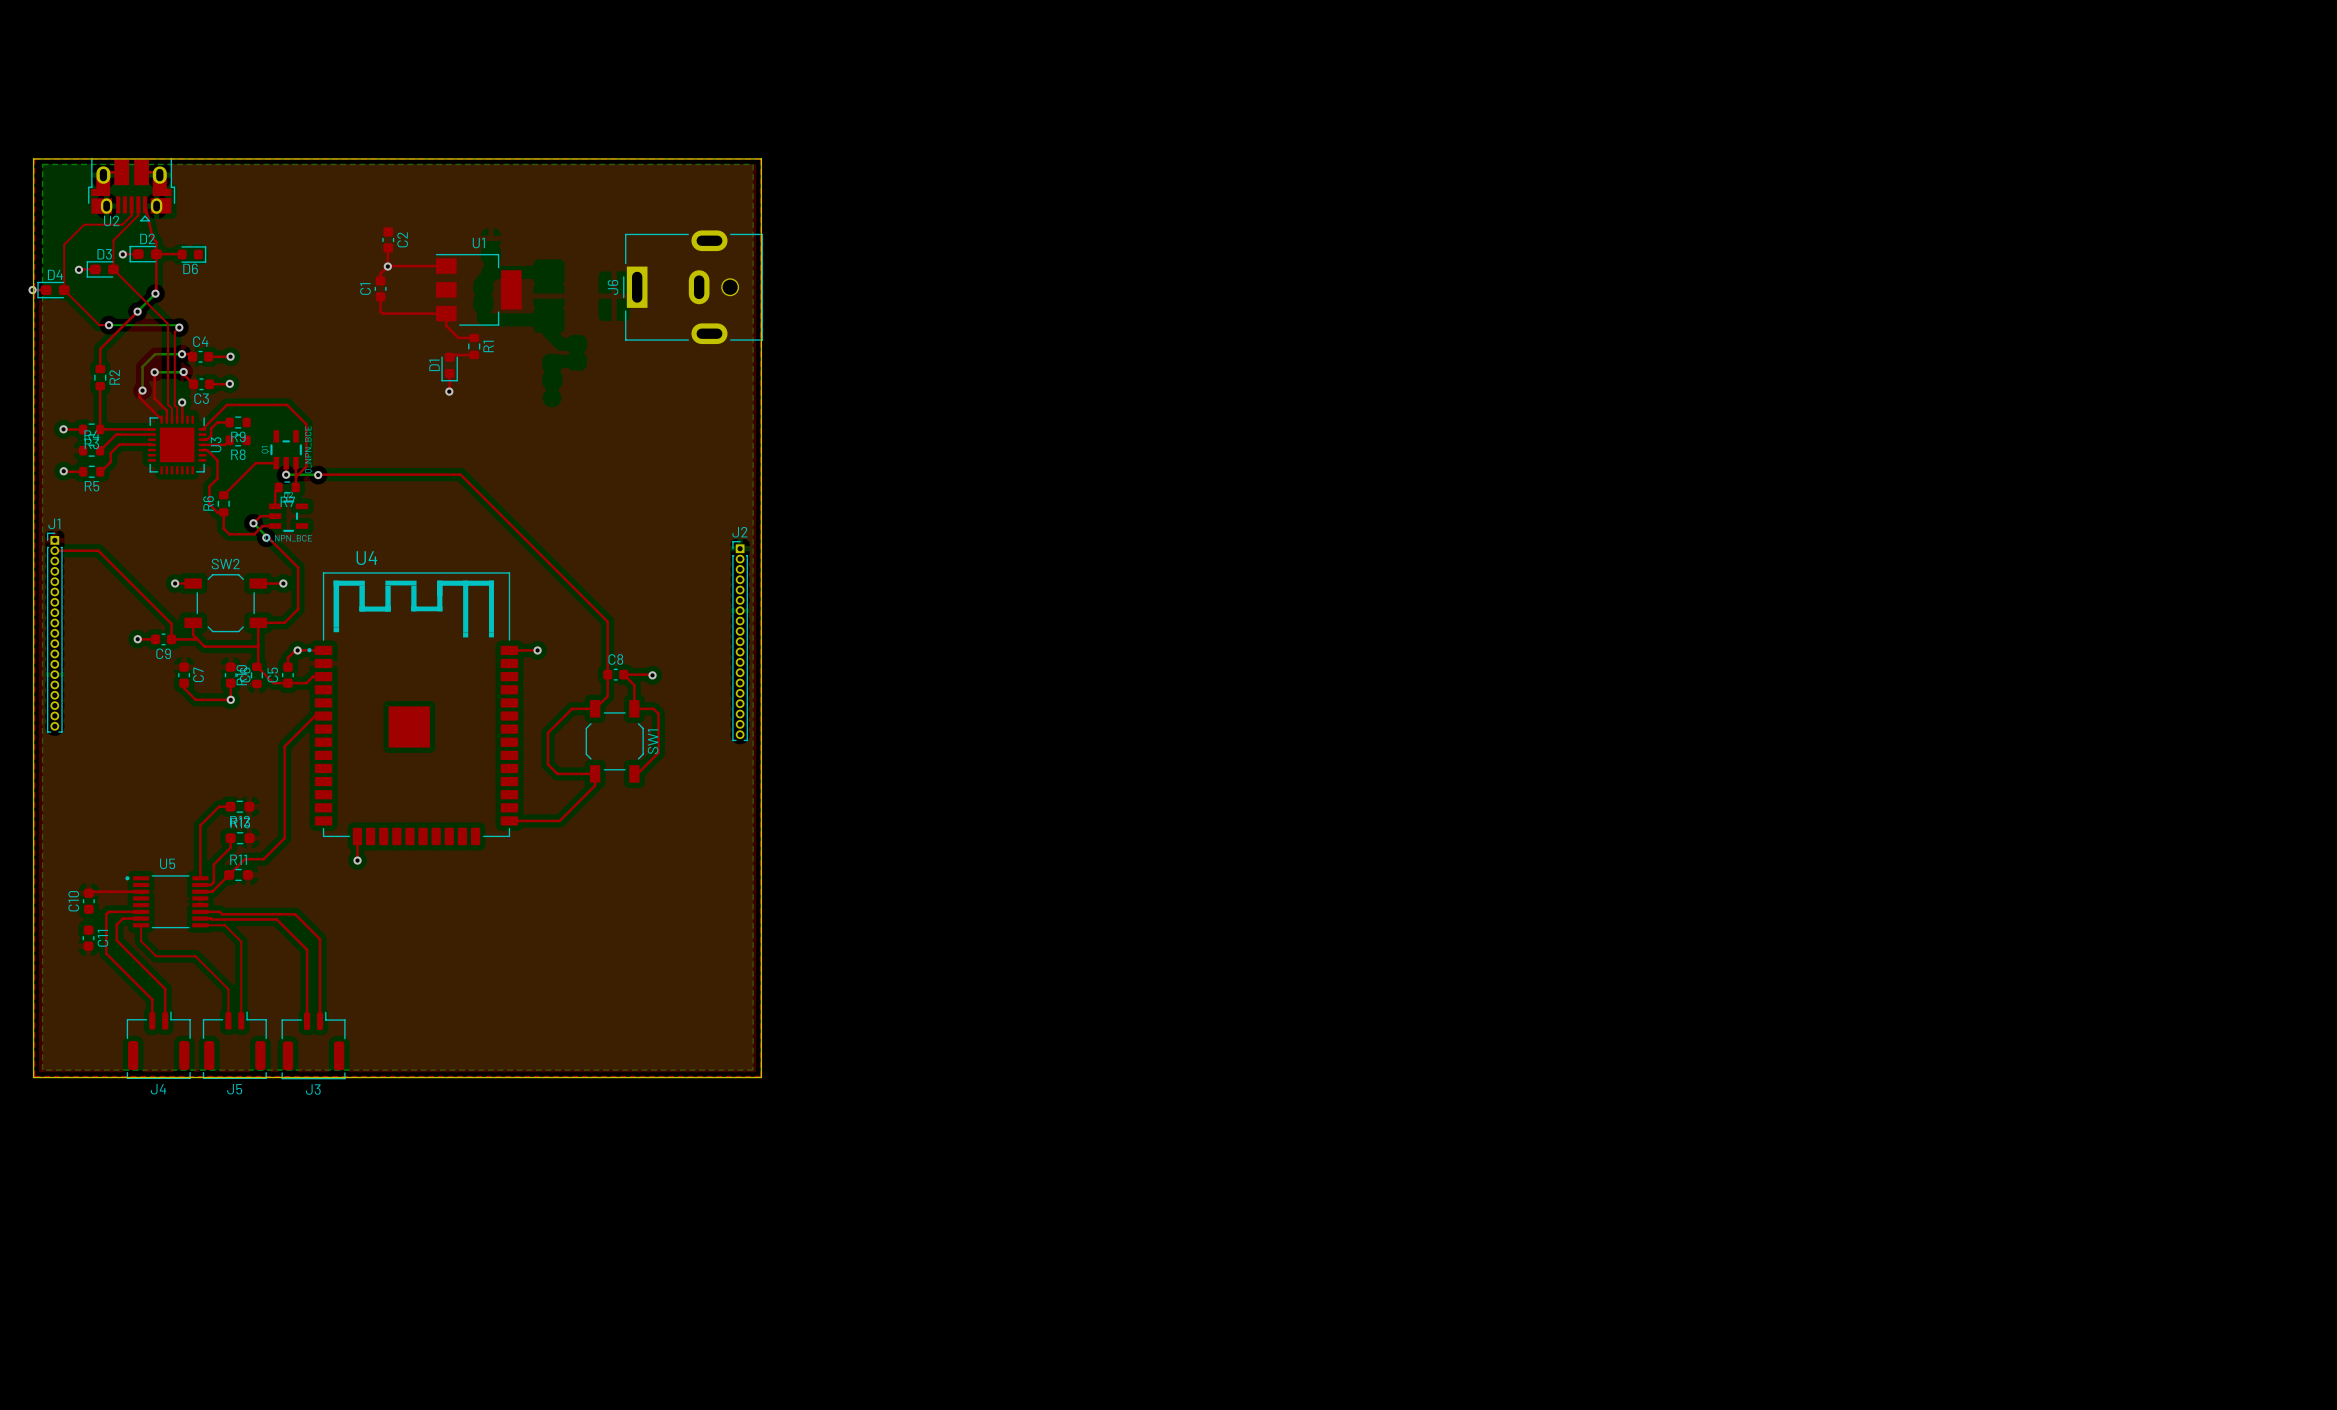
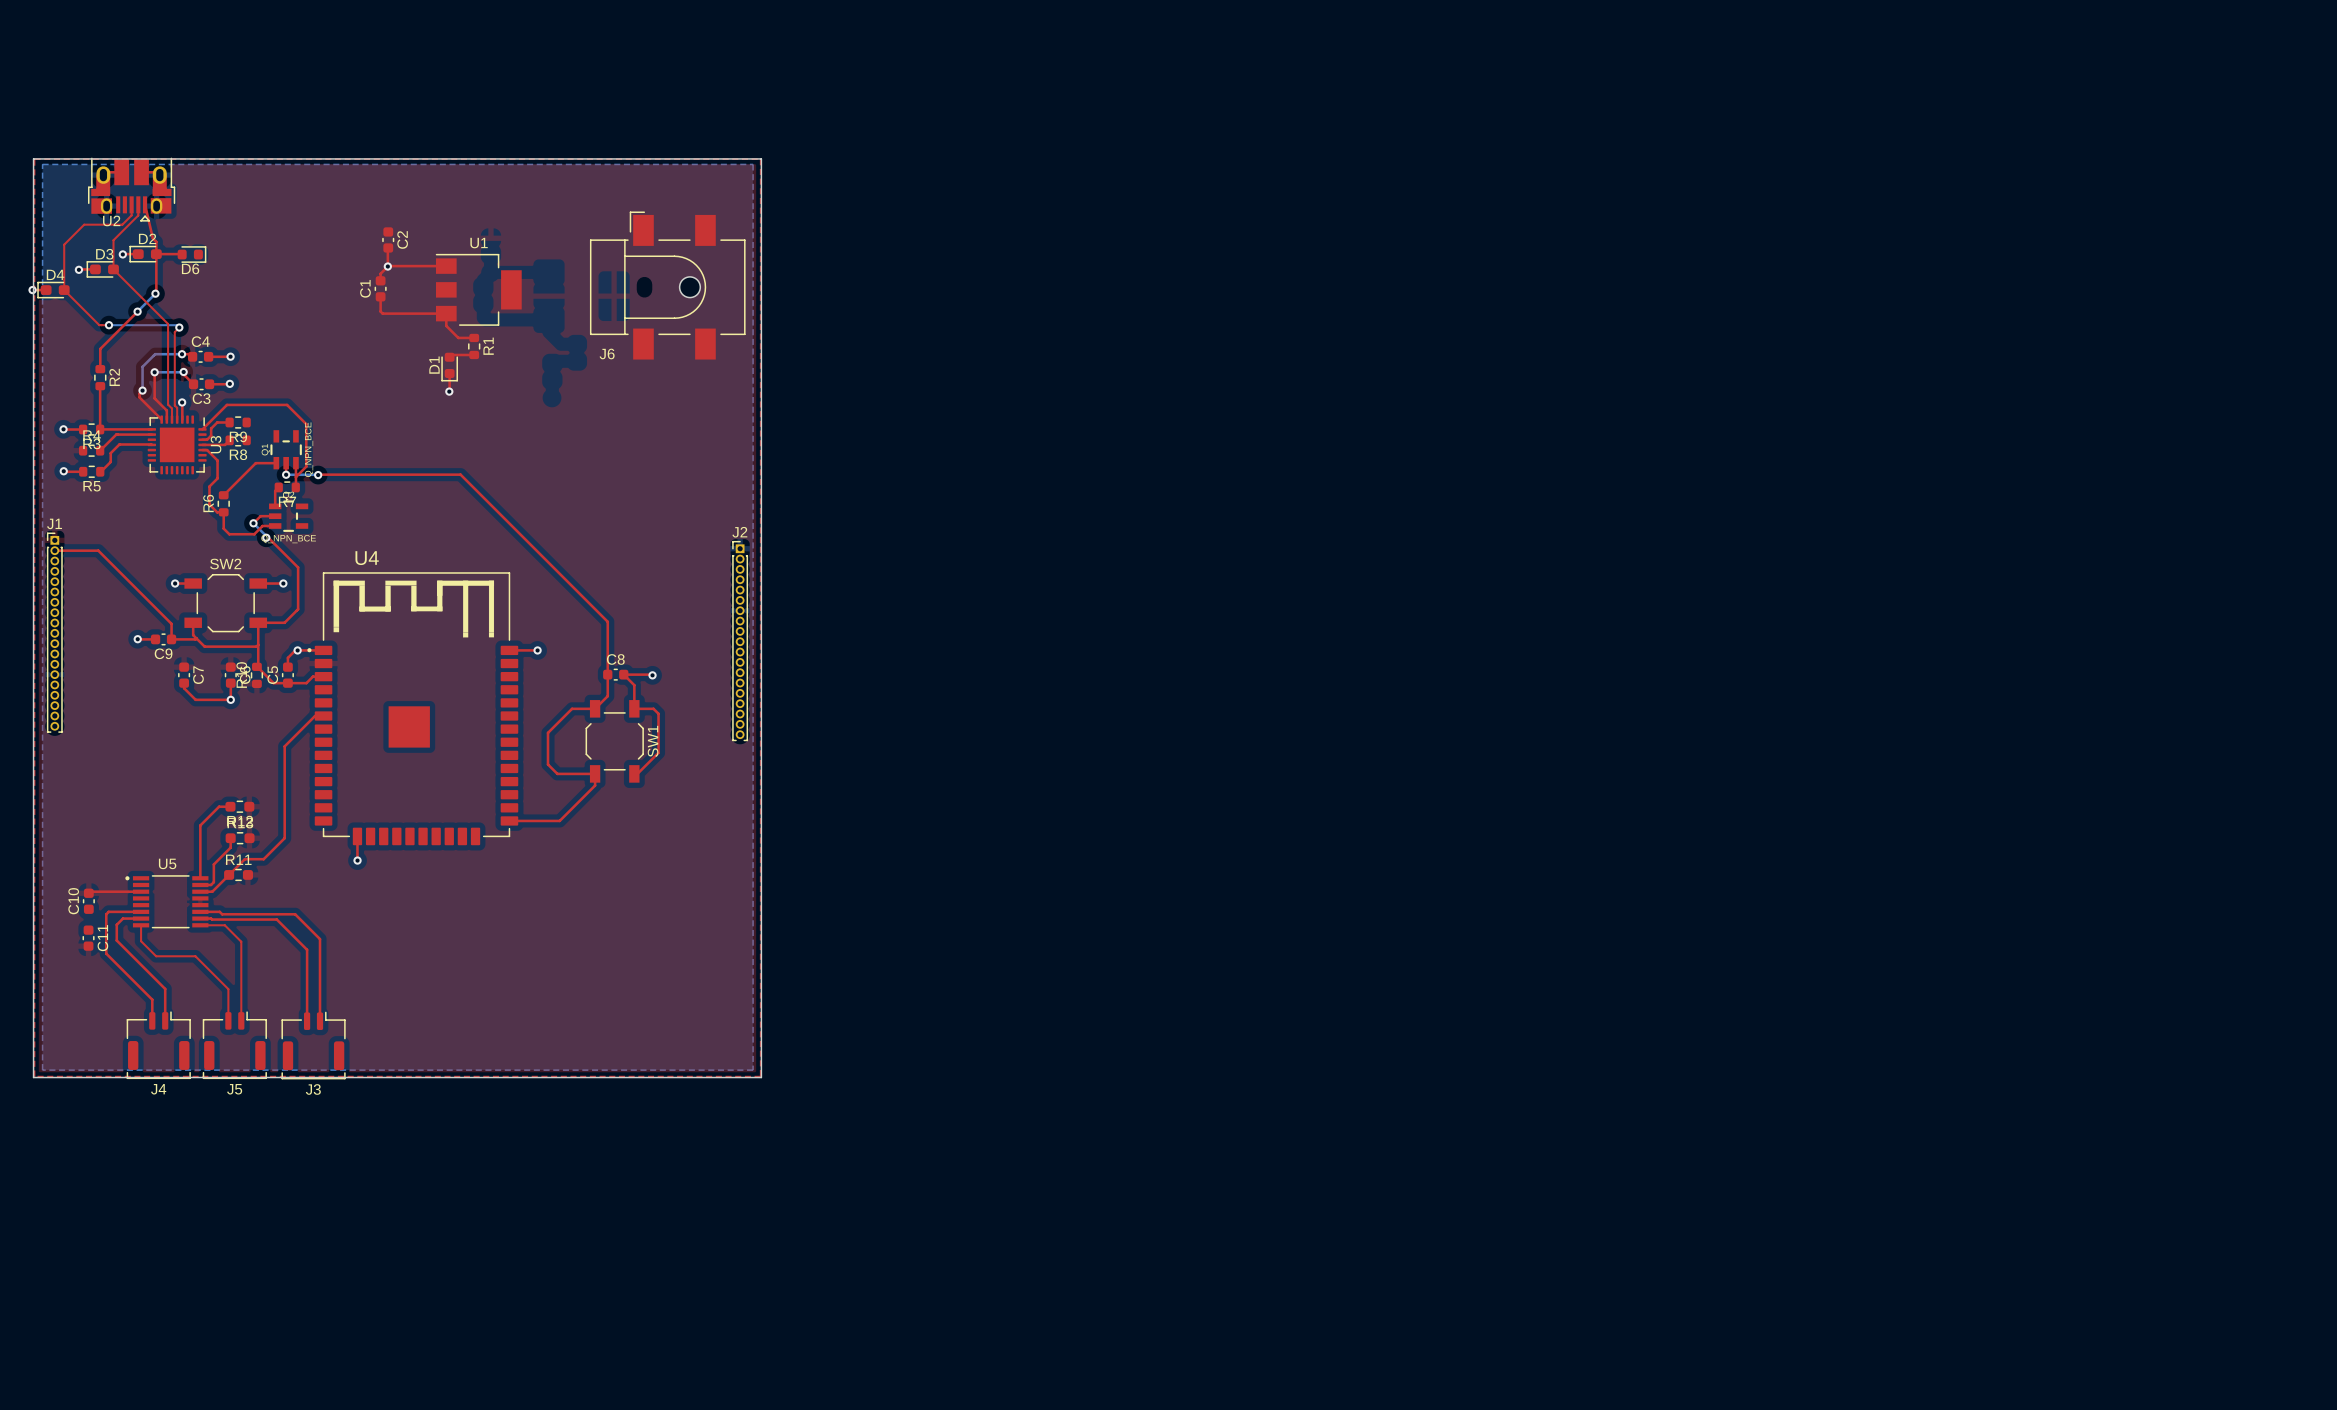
J6 footprint: [623, 230, 763, 345] -> [590, 211, 746, 360]
J6 name position: J6 (613, 287) -> J6 (607, 353)

